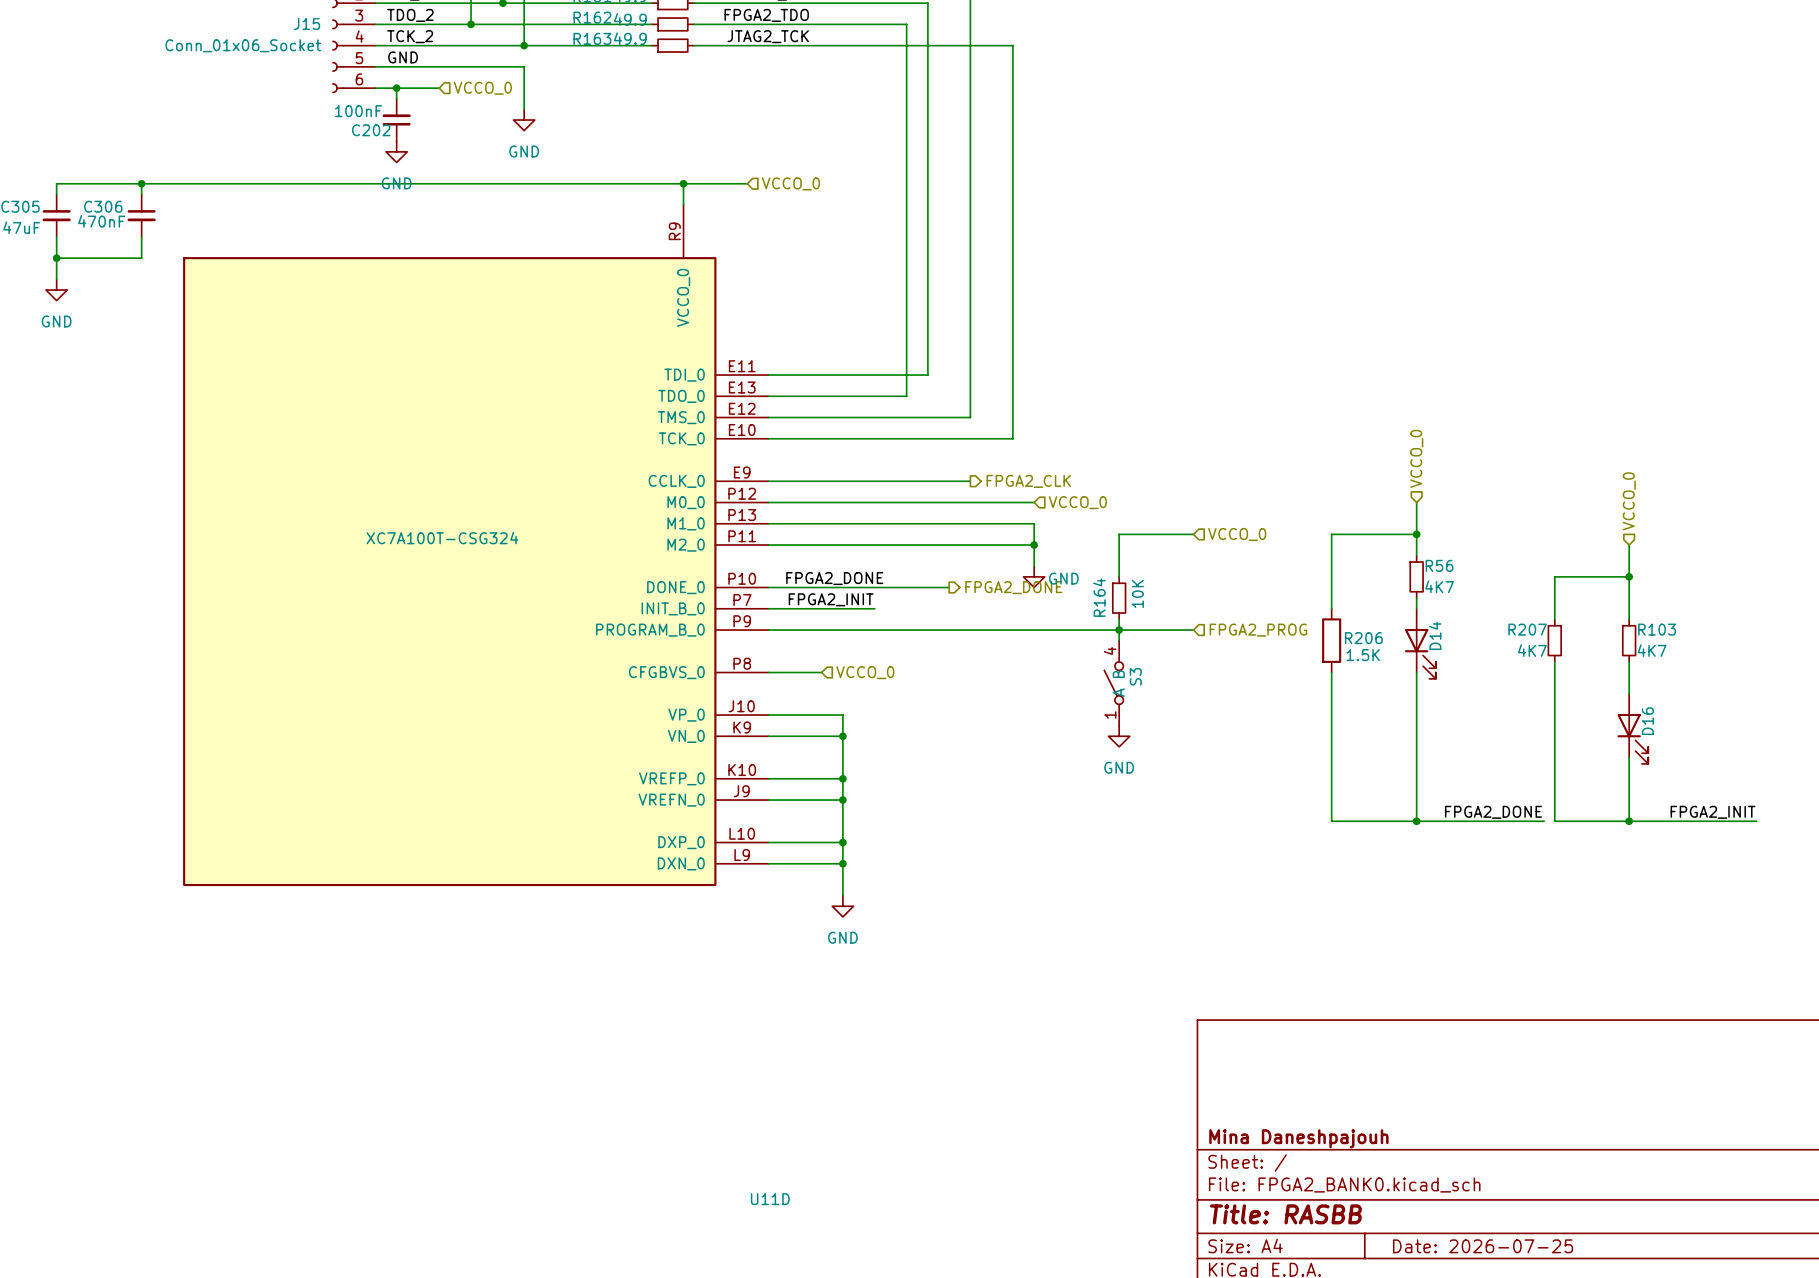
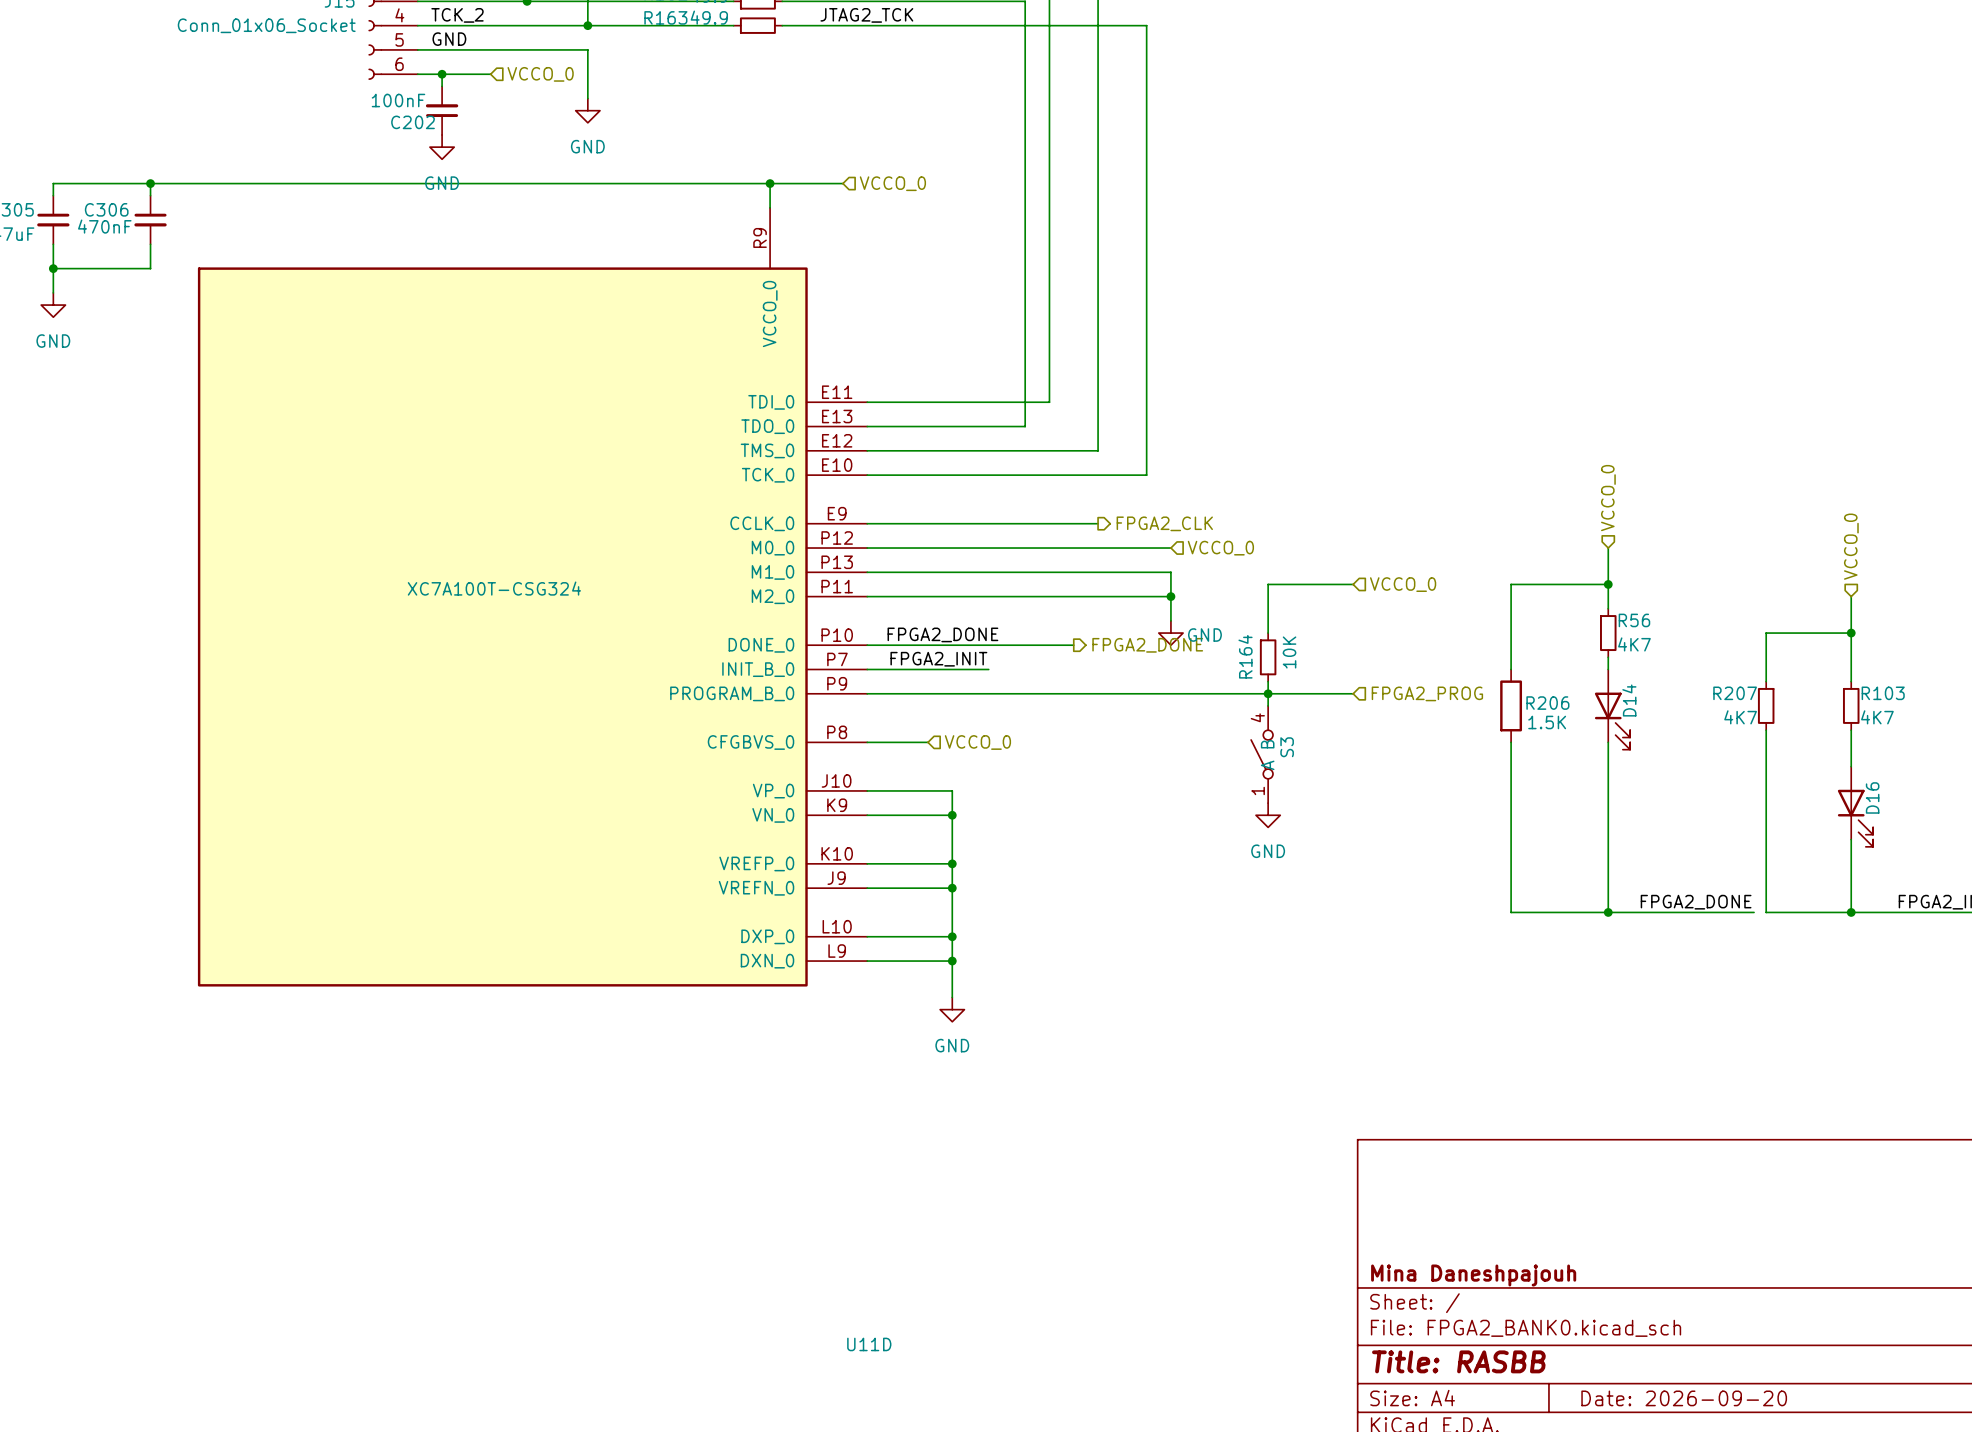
title block: Date: 2026-07-25 (1483, 1246) -> Date: 2026-09-20 (1684, 1398)

